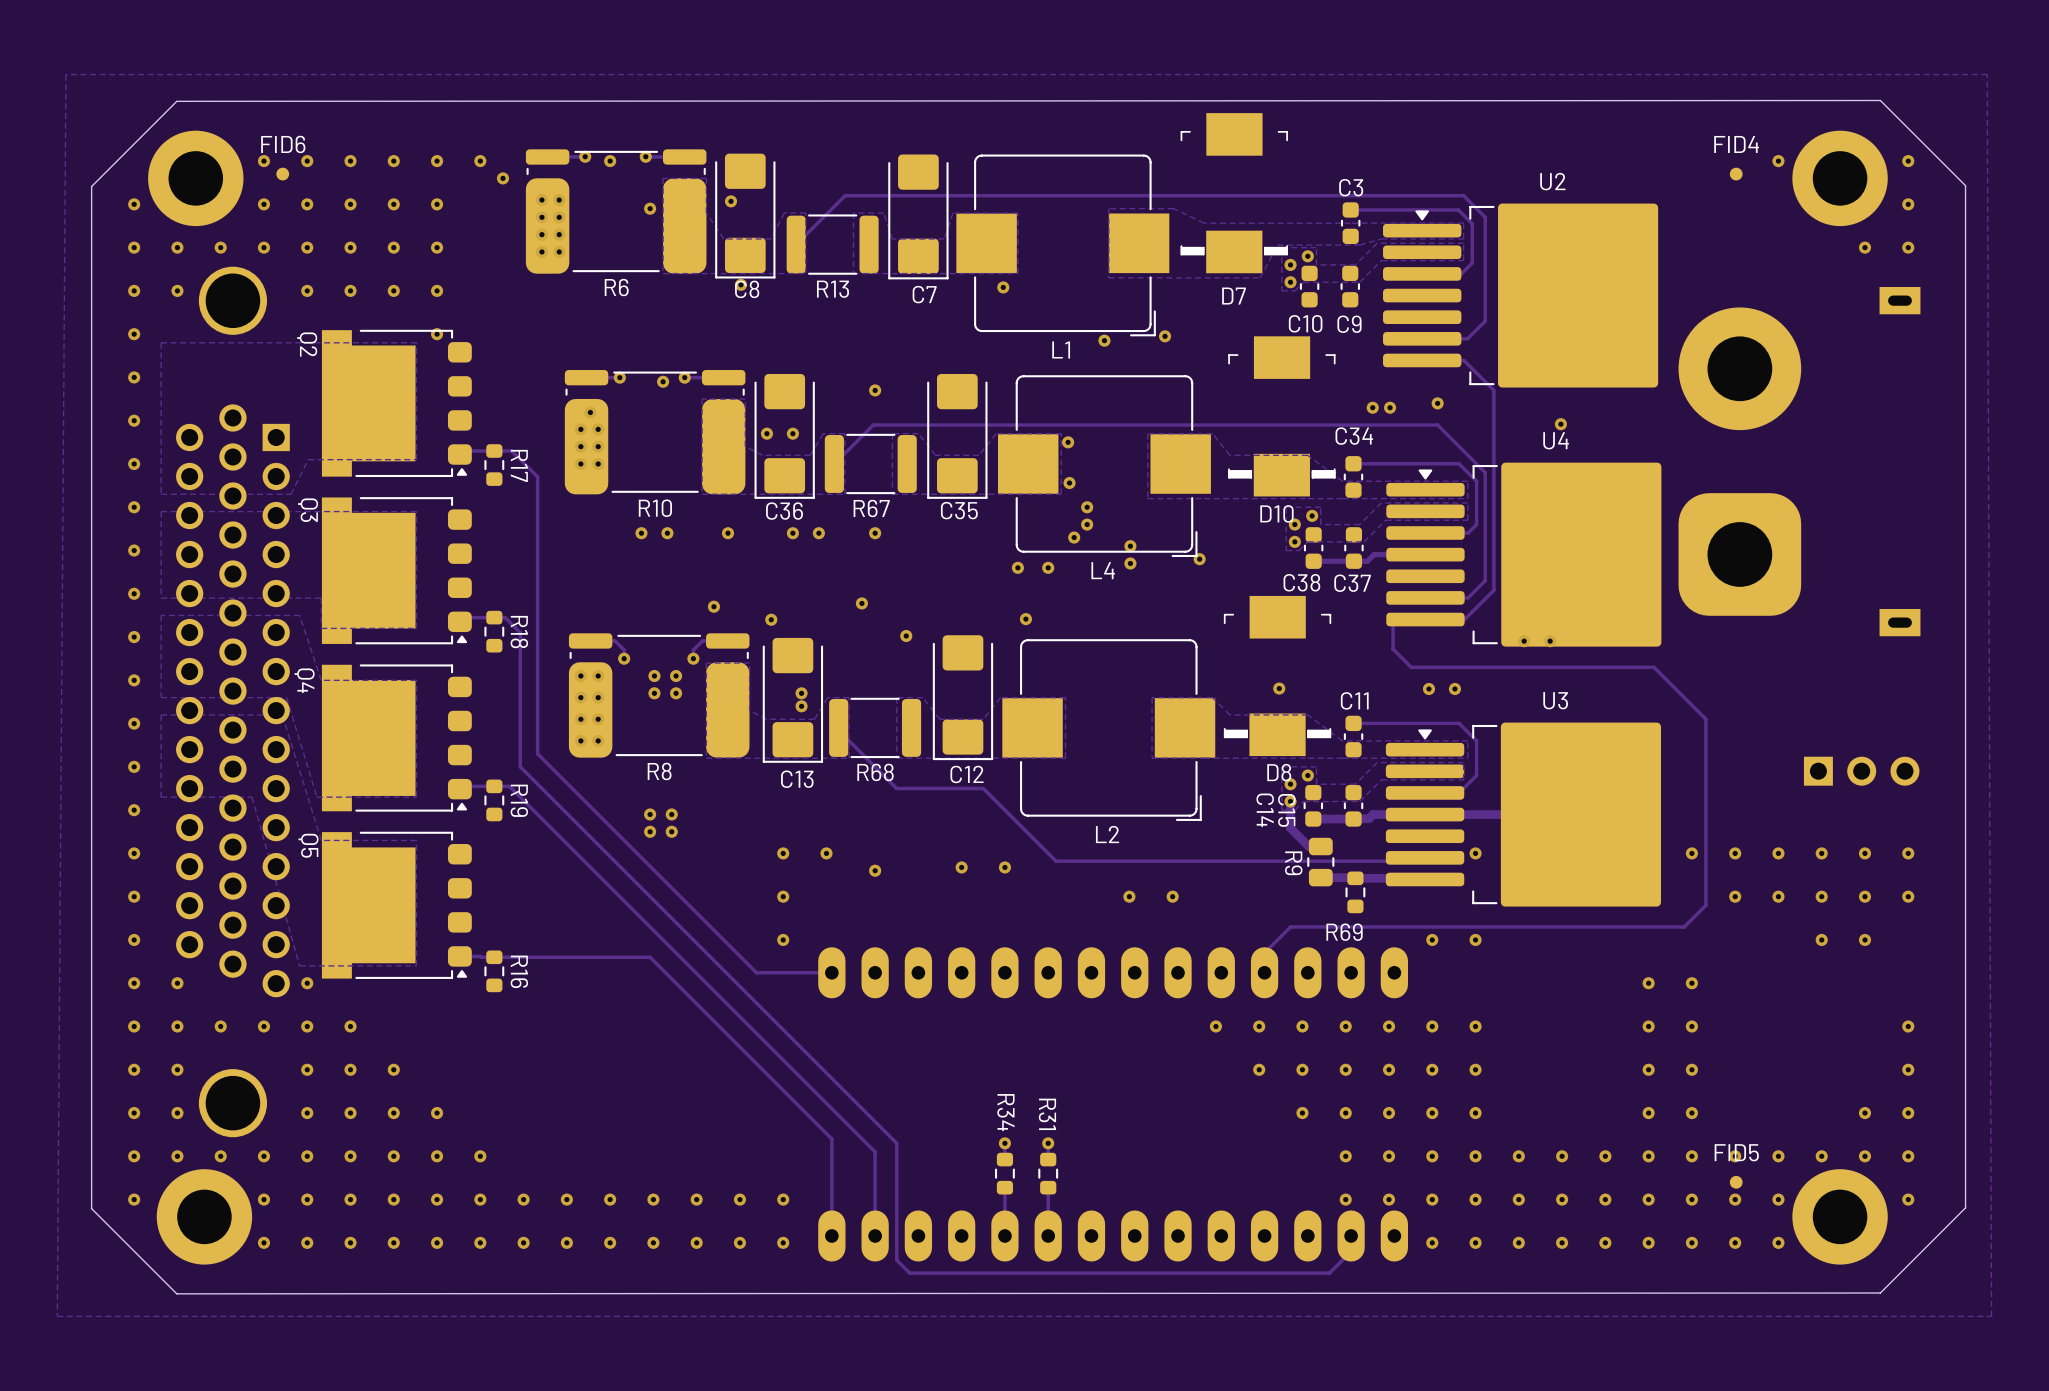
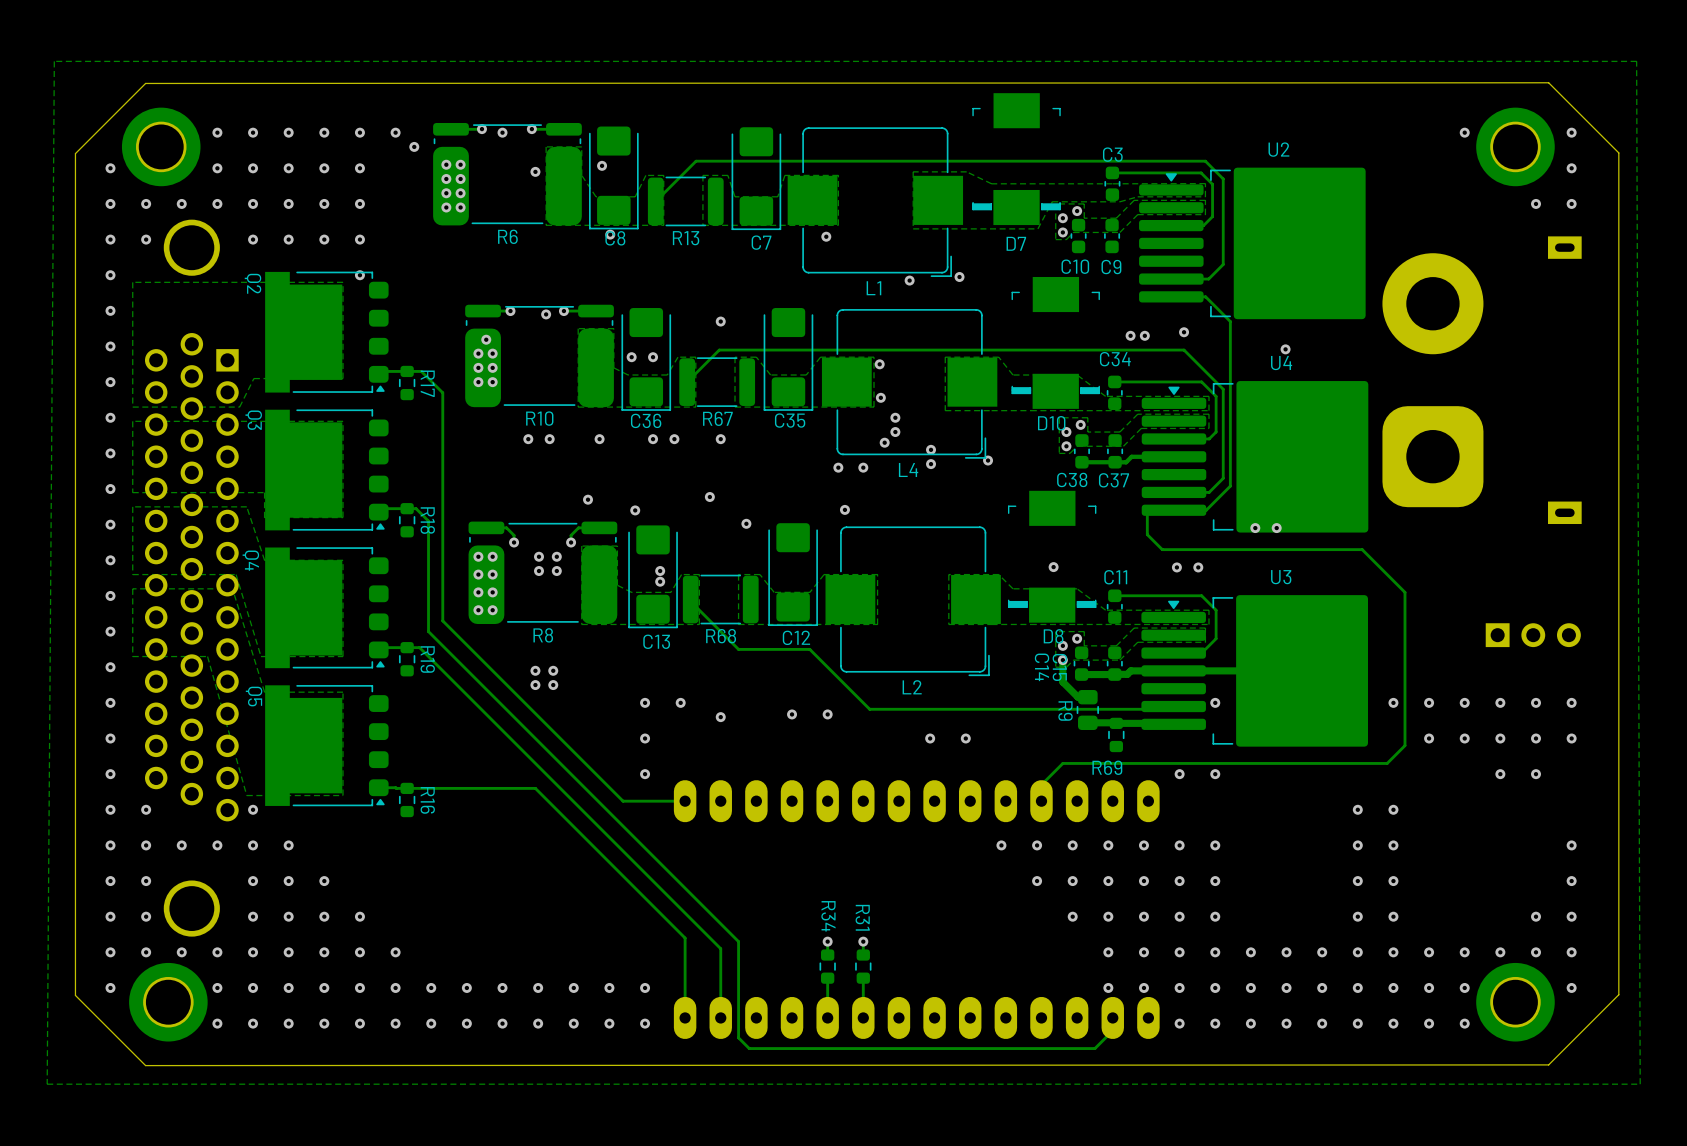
FID6: (282, 174) -> none
FID4: (1736, 174) -> none
FID5: (1736, 1182) -> none

